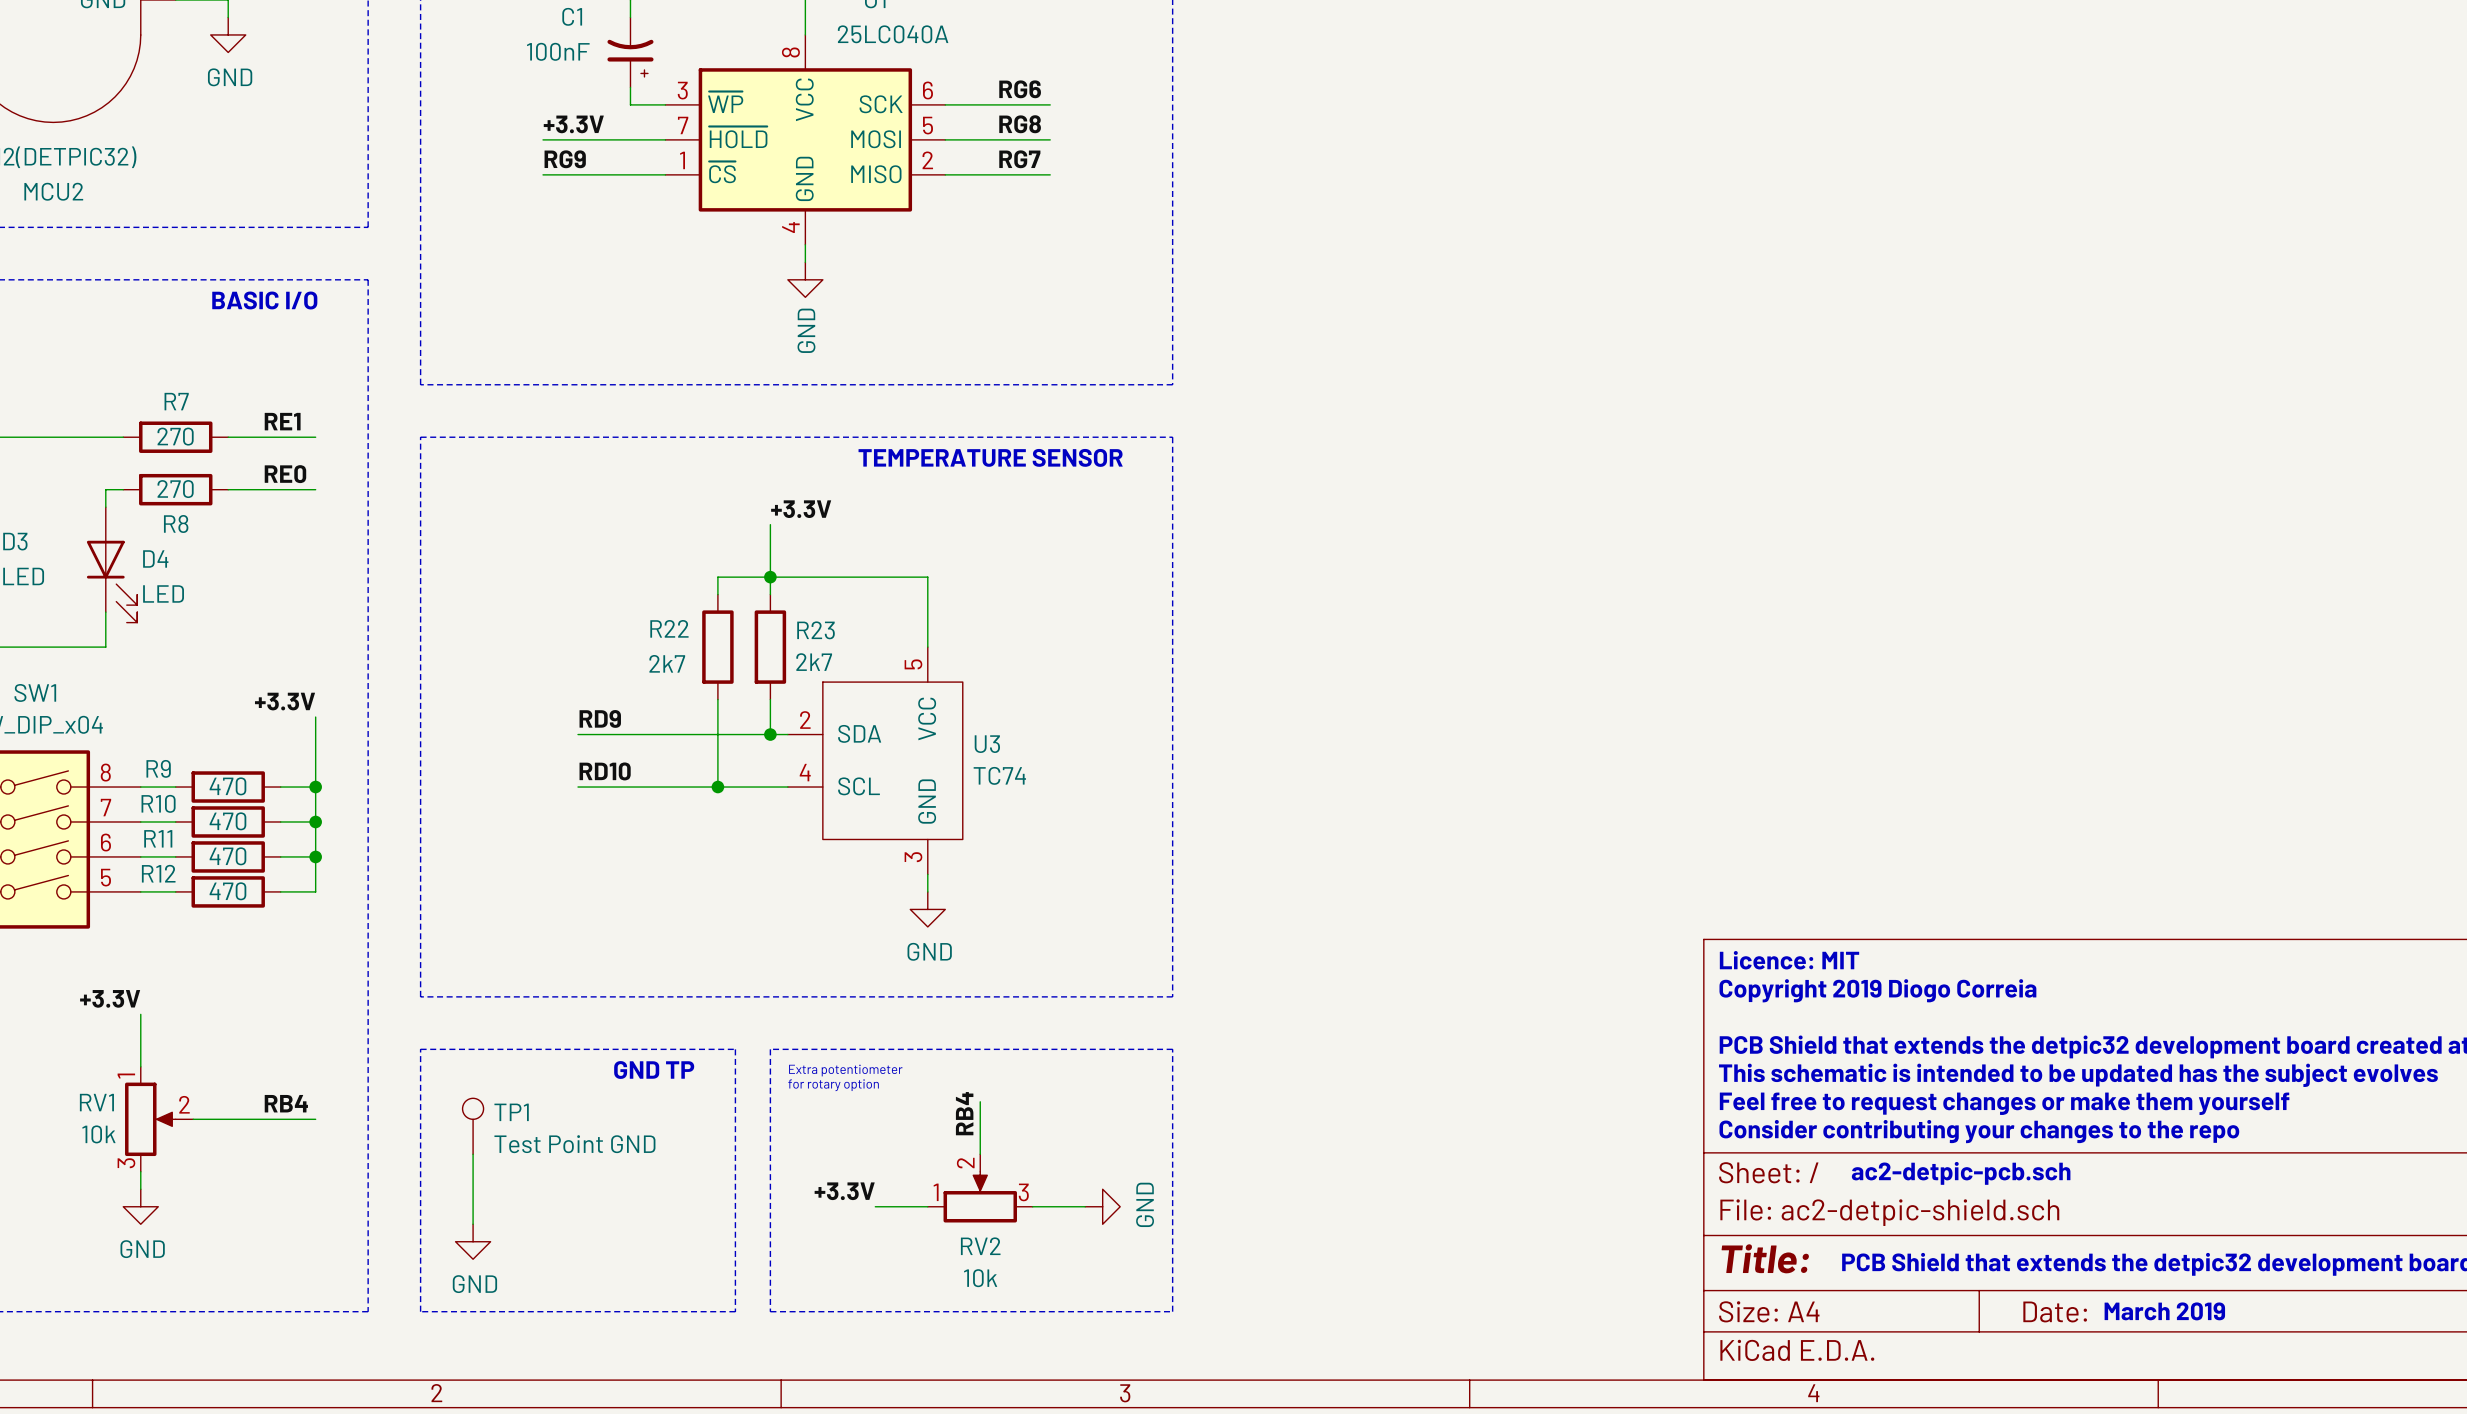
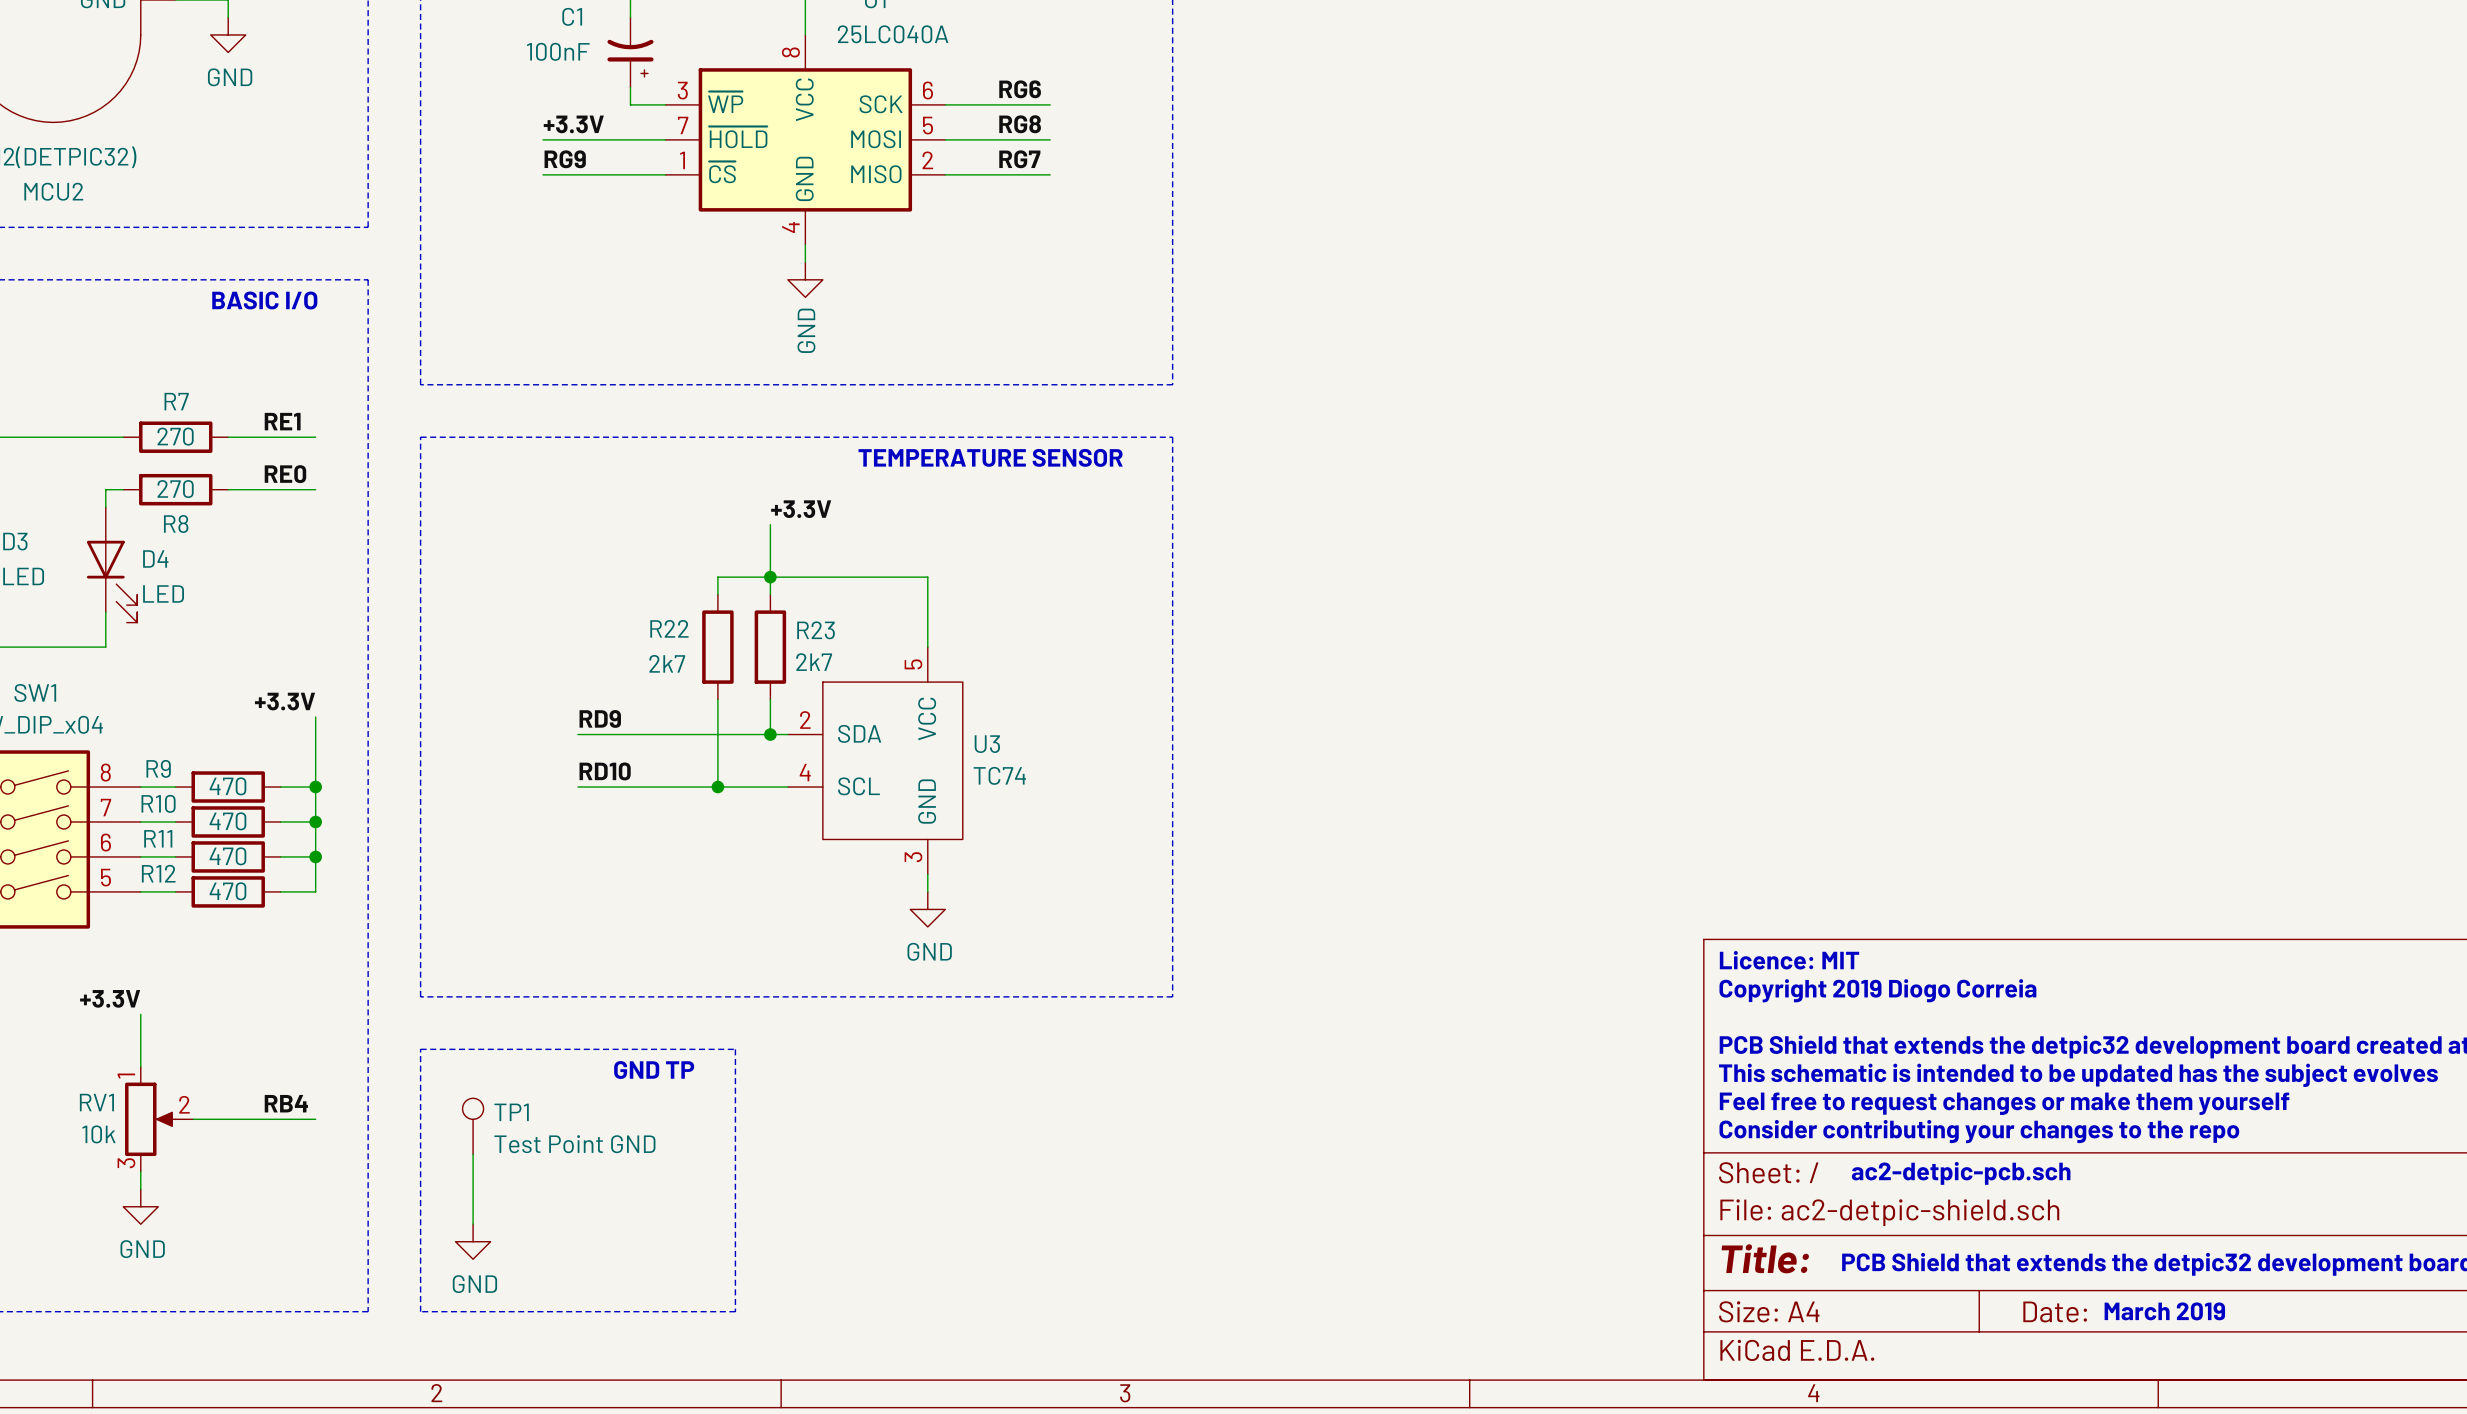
line: (770, 1049) (770, 1311) (1172, 1311) (1172, 1049) (770, 1049) -> none
text: Extra potentiometer (845, 1070) -> none
text: for rotary option (833, 1085) -> none
wire: (980, 1101) (980, 1154) -> none
label: RB4 (964, 1113) -> none
RV2: 10k (980, 1188) -> none
label: +3.3V (844, 1191) -> none
wire: (875, 1206) (927, 1206) -> none
wire: (1032, 1206) (1085, 1206) -> none
power symbol: GND (1102, 1206) -> none

